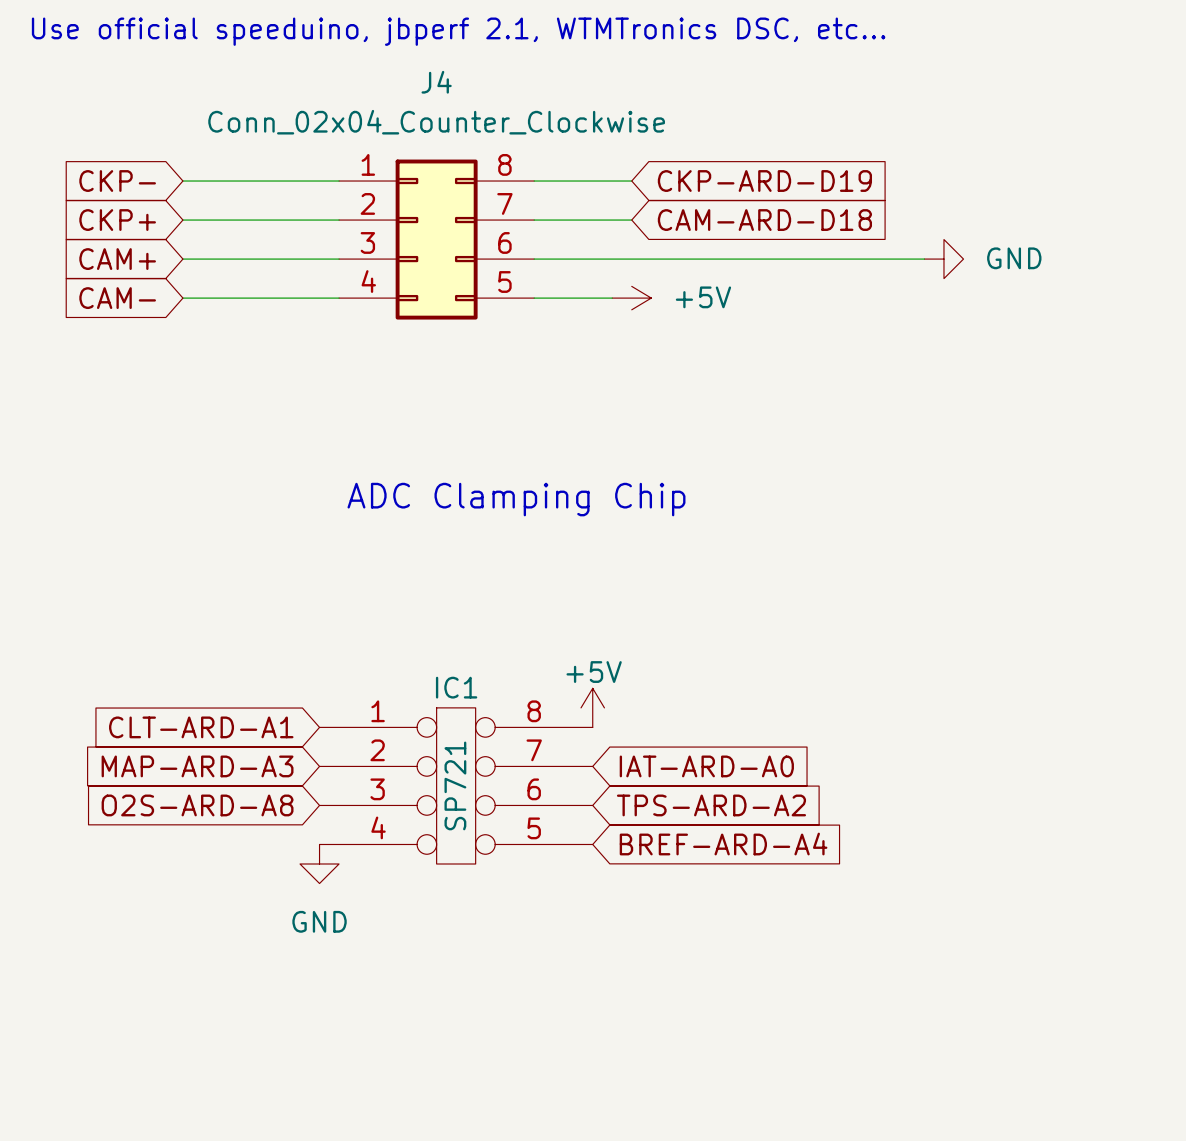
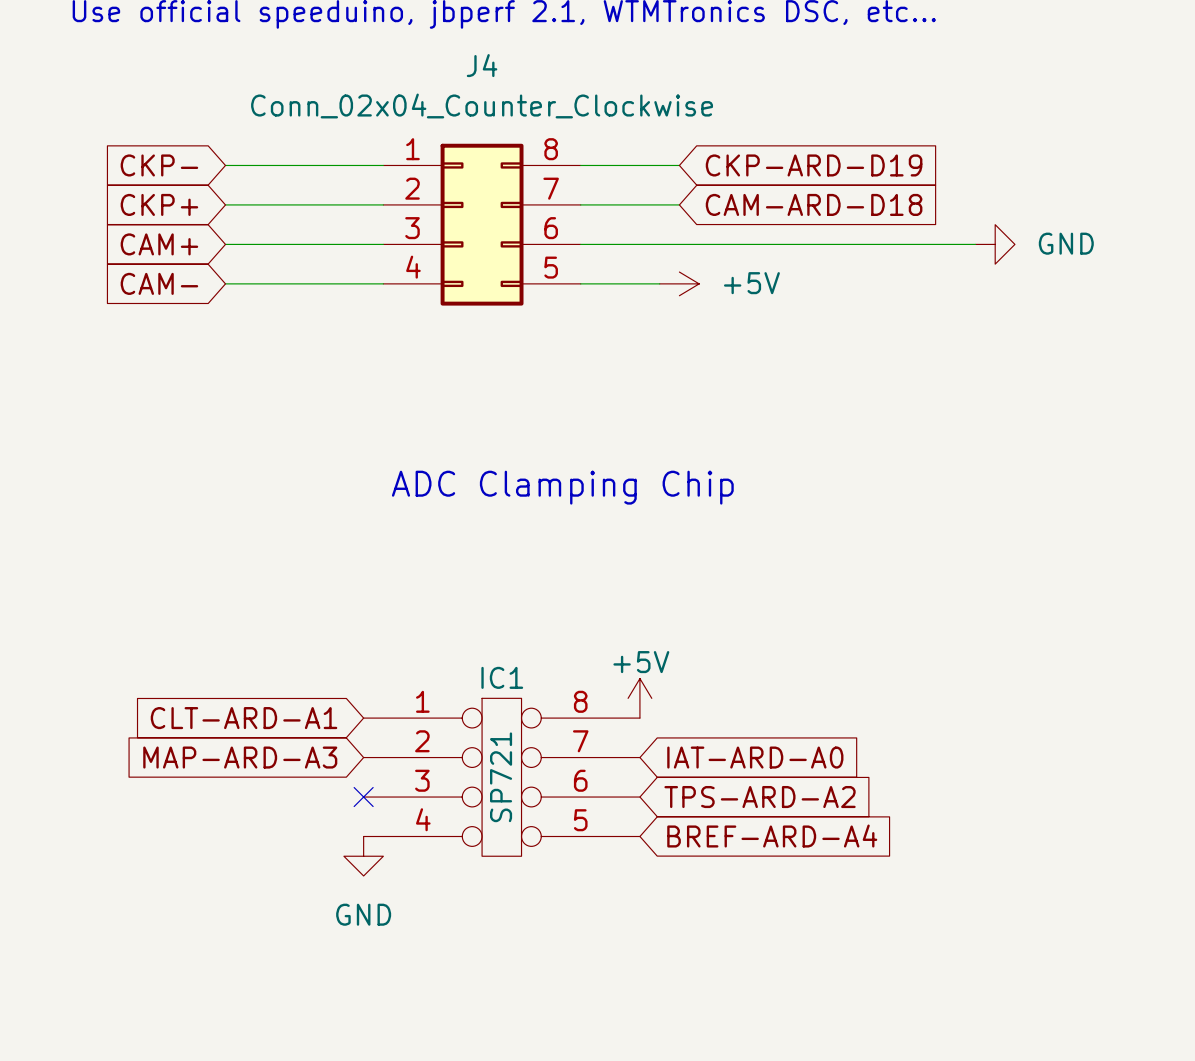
global label: O2S-ARD-A8 (197, 805) -> none
no-connect mark: none -> (363, 797)

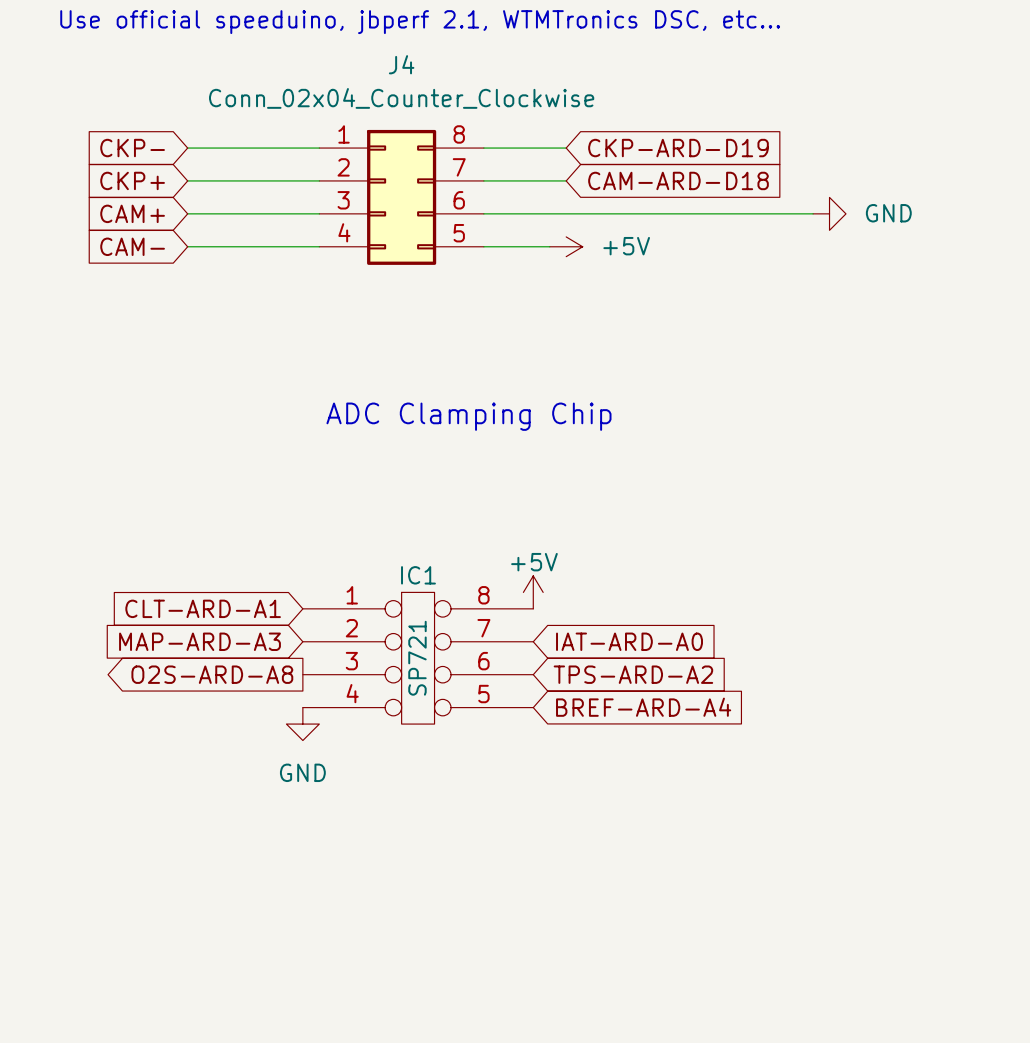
global label: none -> O2S-ARD-A8 (212, 674)
no-connect mark: (363, 797) -> none

